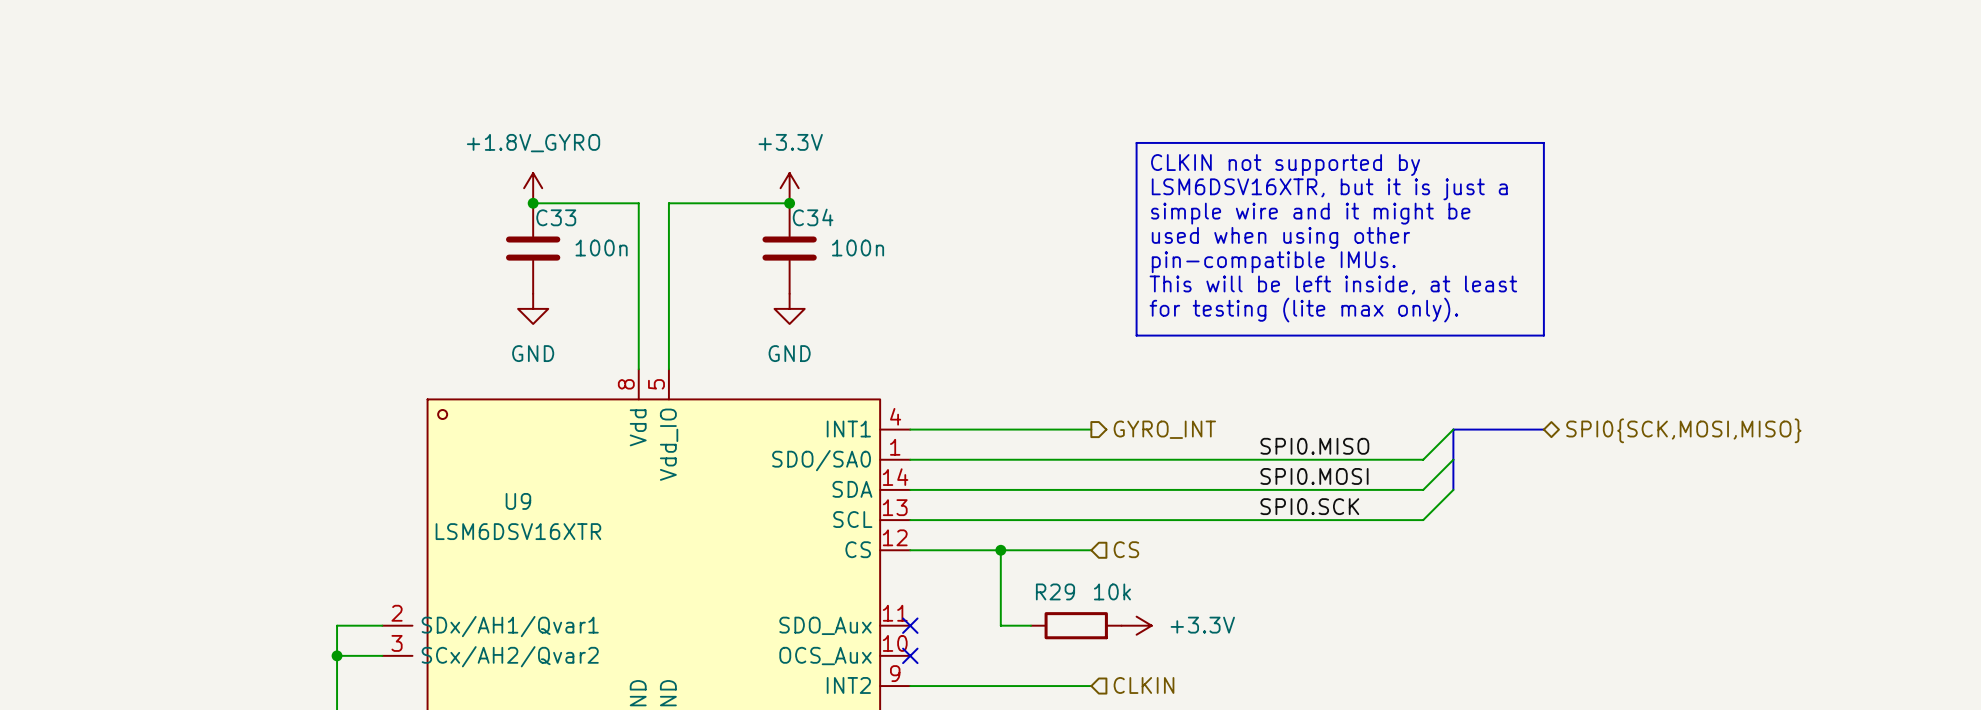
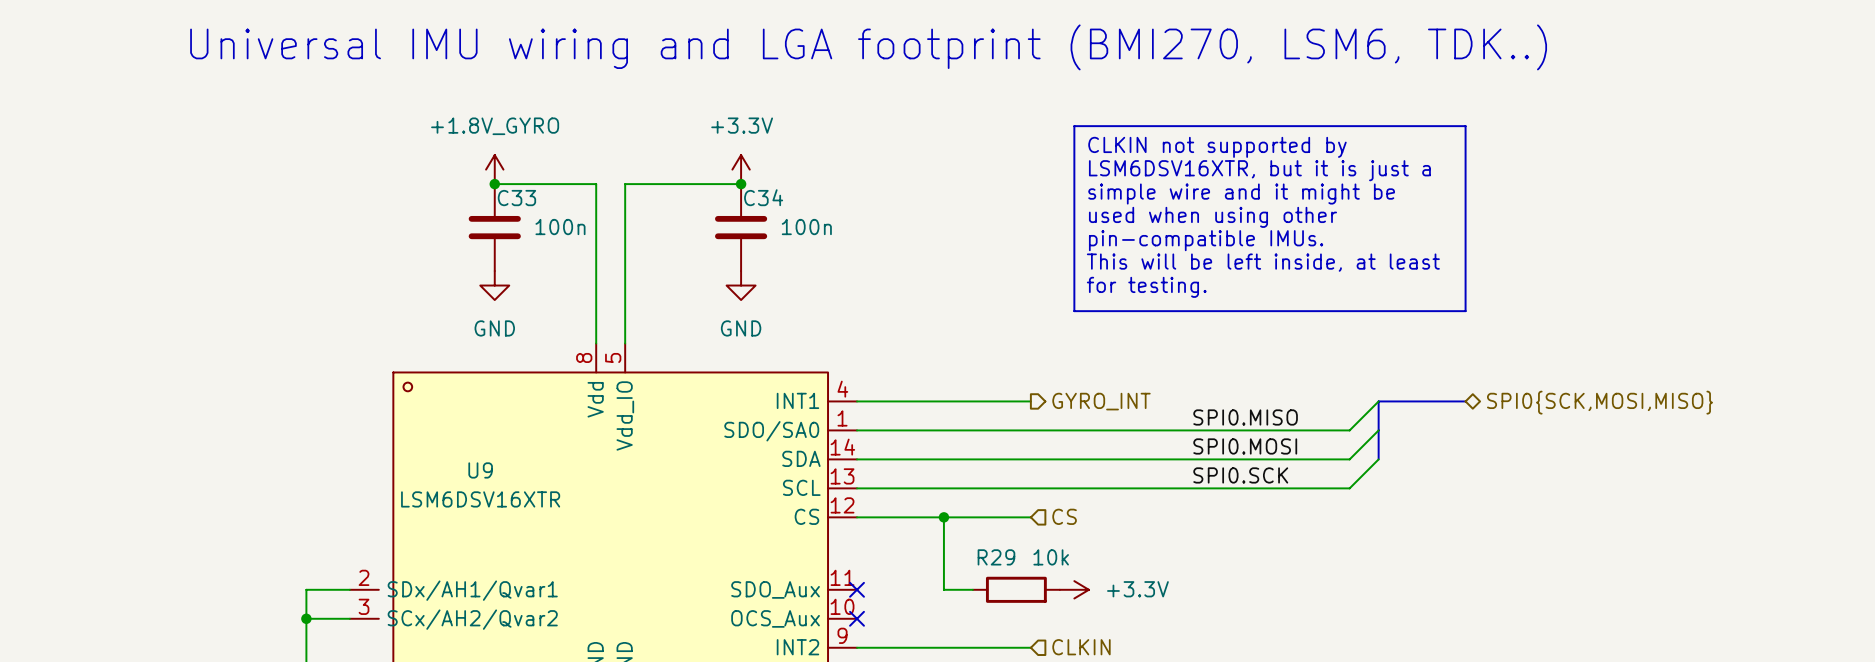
text: none -> Universal IMU wiring and LGA footprint (BMI270, LSM6, TDK..) (868, 47)
text: for testing (lite max only). (1303, 310) -> for testing. (1146, 287)

